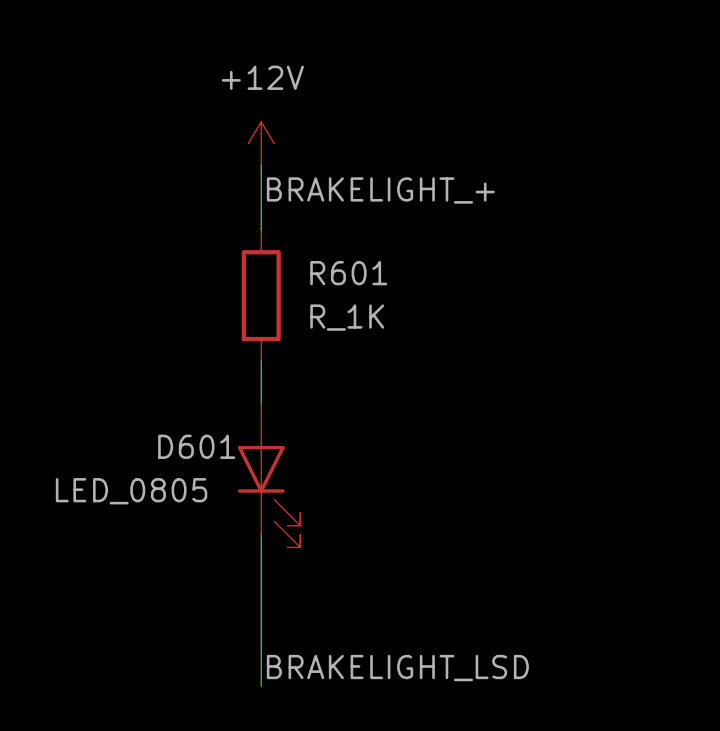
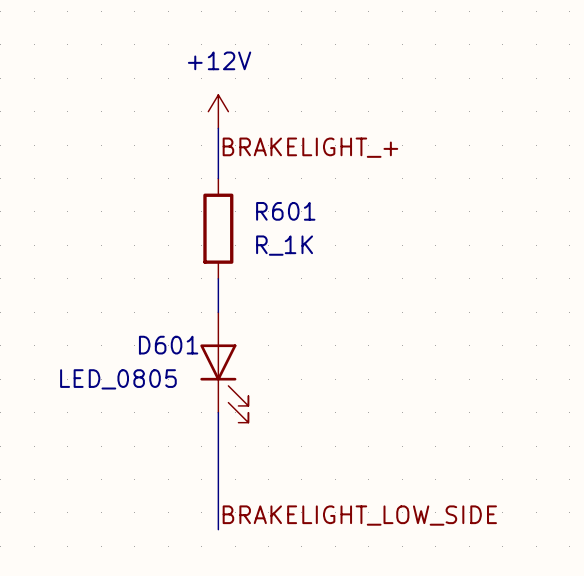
label: BRAKELIGHT_LSD (397, 668) -> BRAKELIGHT_LOW_SIDE (359, 515)

